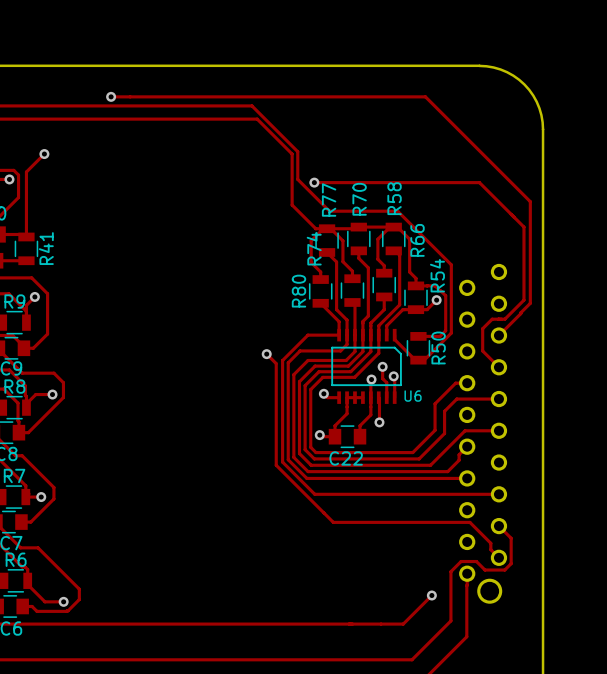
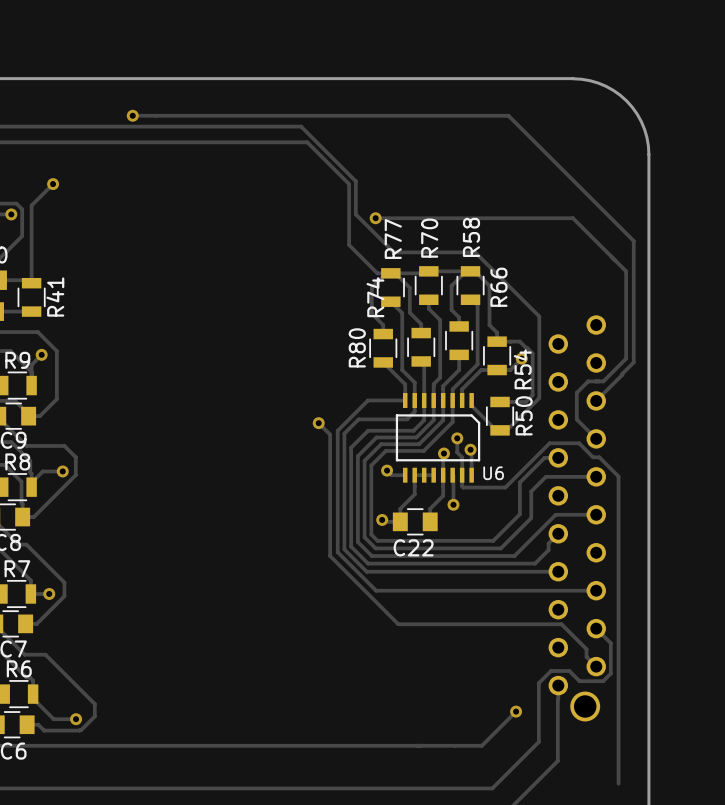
R54 name position: R54 (437, 275) -> R54 (522, 369)
track: none -> (462, 475) (463, 487) (505, 487) (549, 443) (579, 443) (593, 457) (599, 457) (618, 476) (618, 783)

